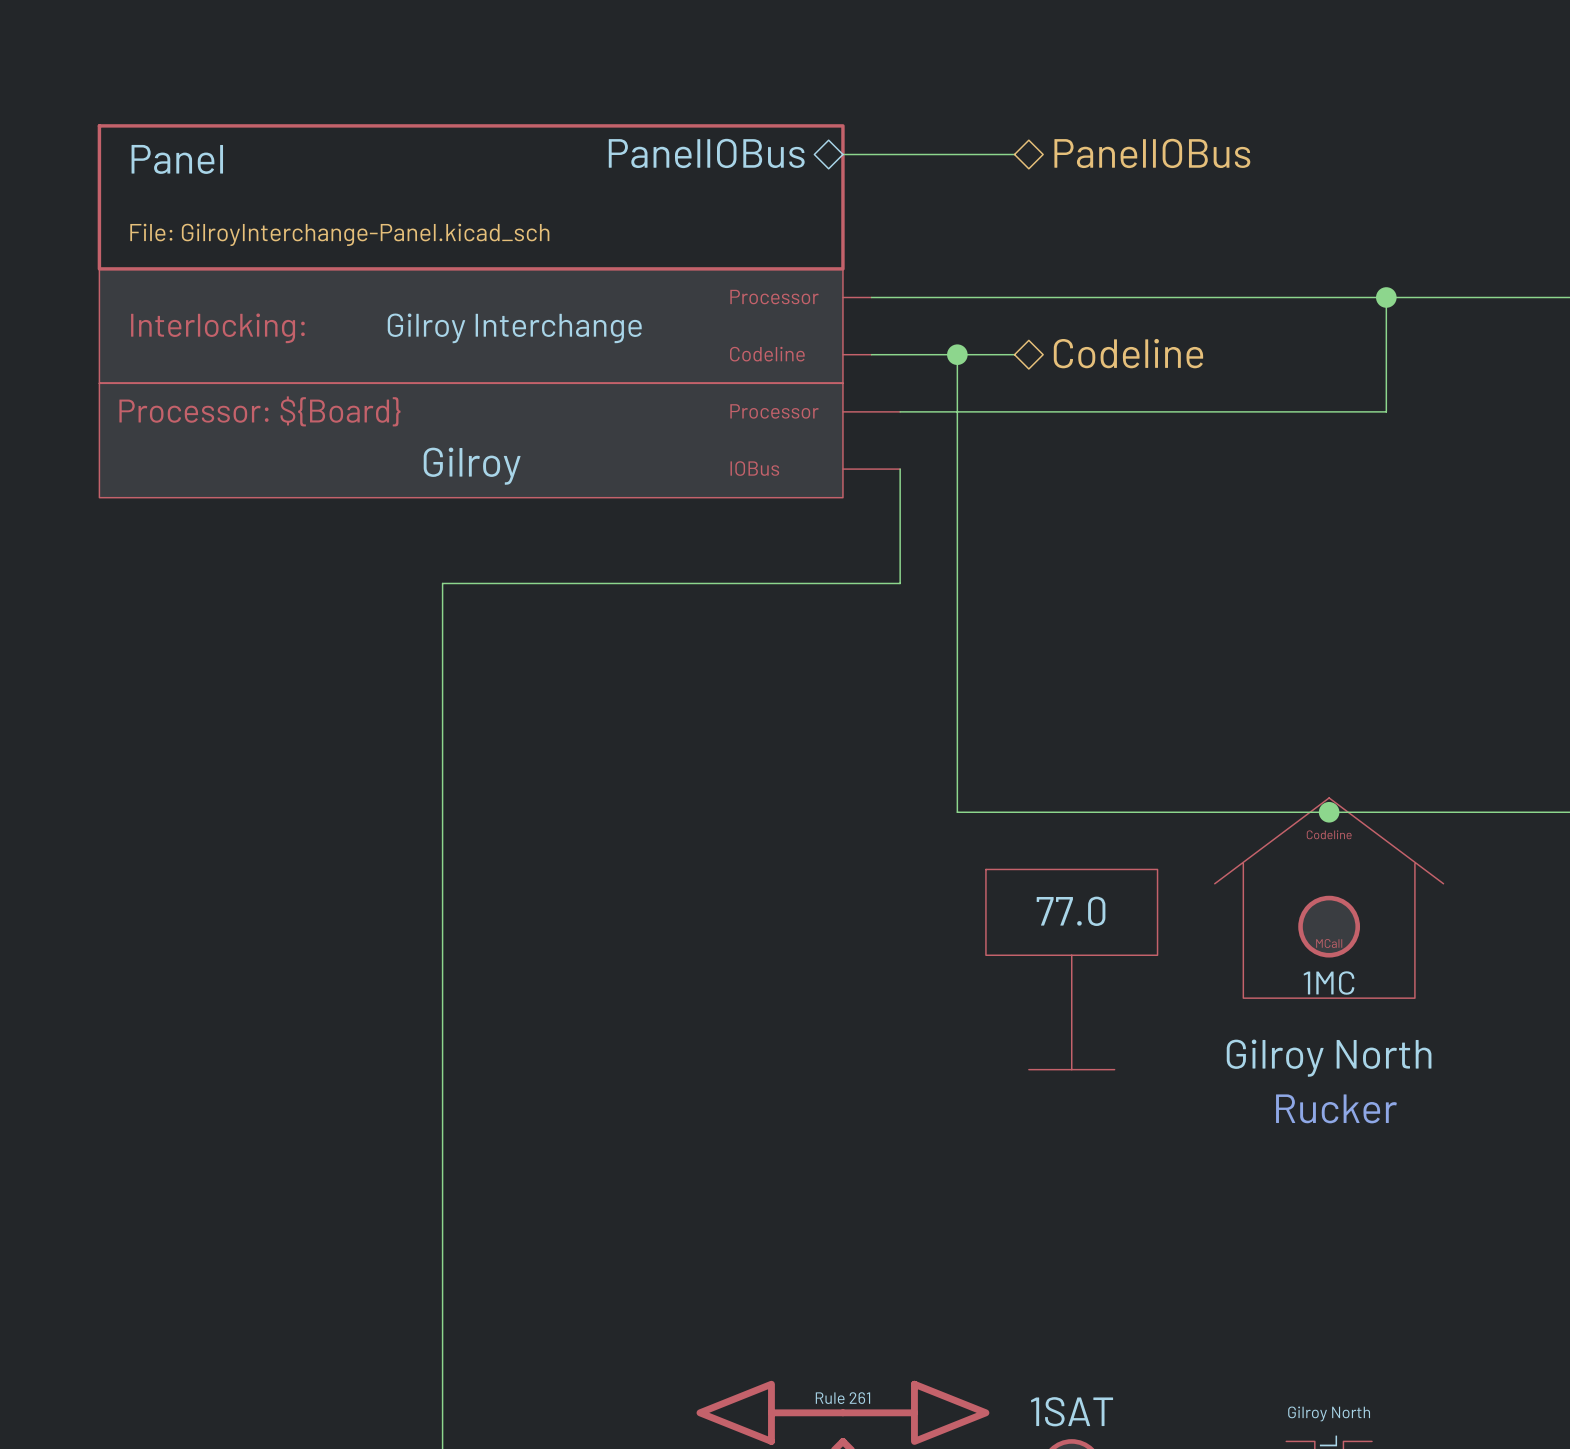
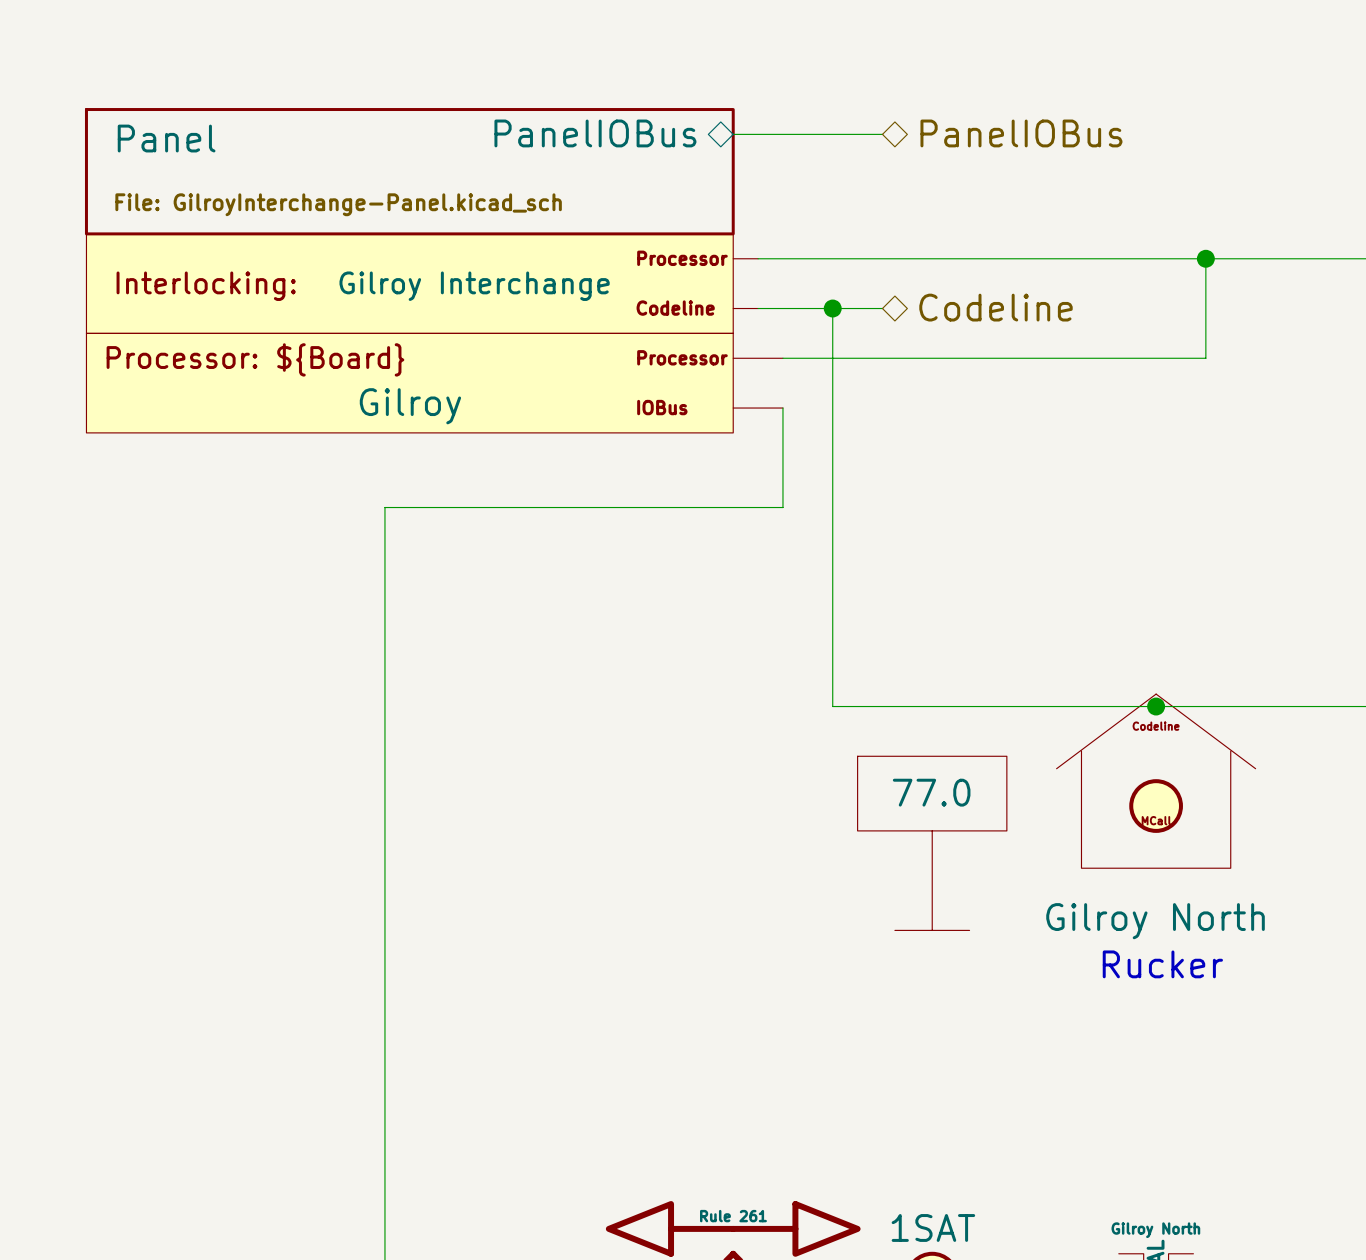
part text: 1MC (1329, 983) -> none

